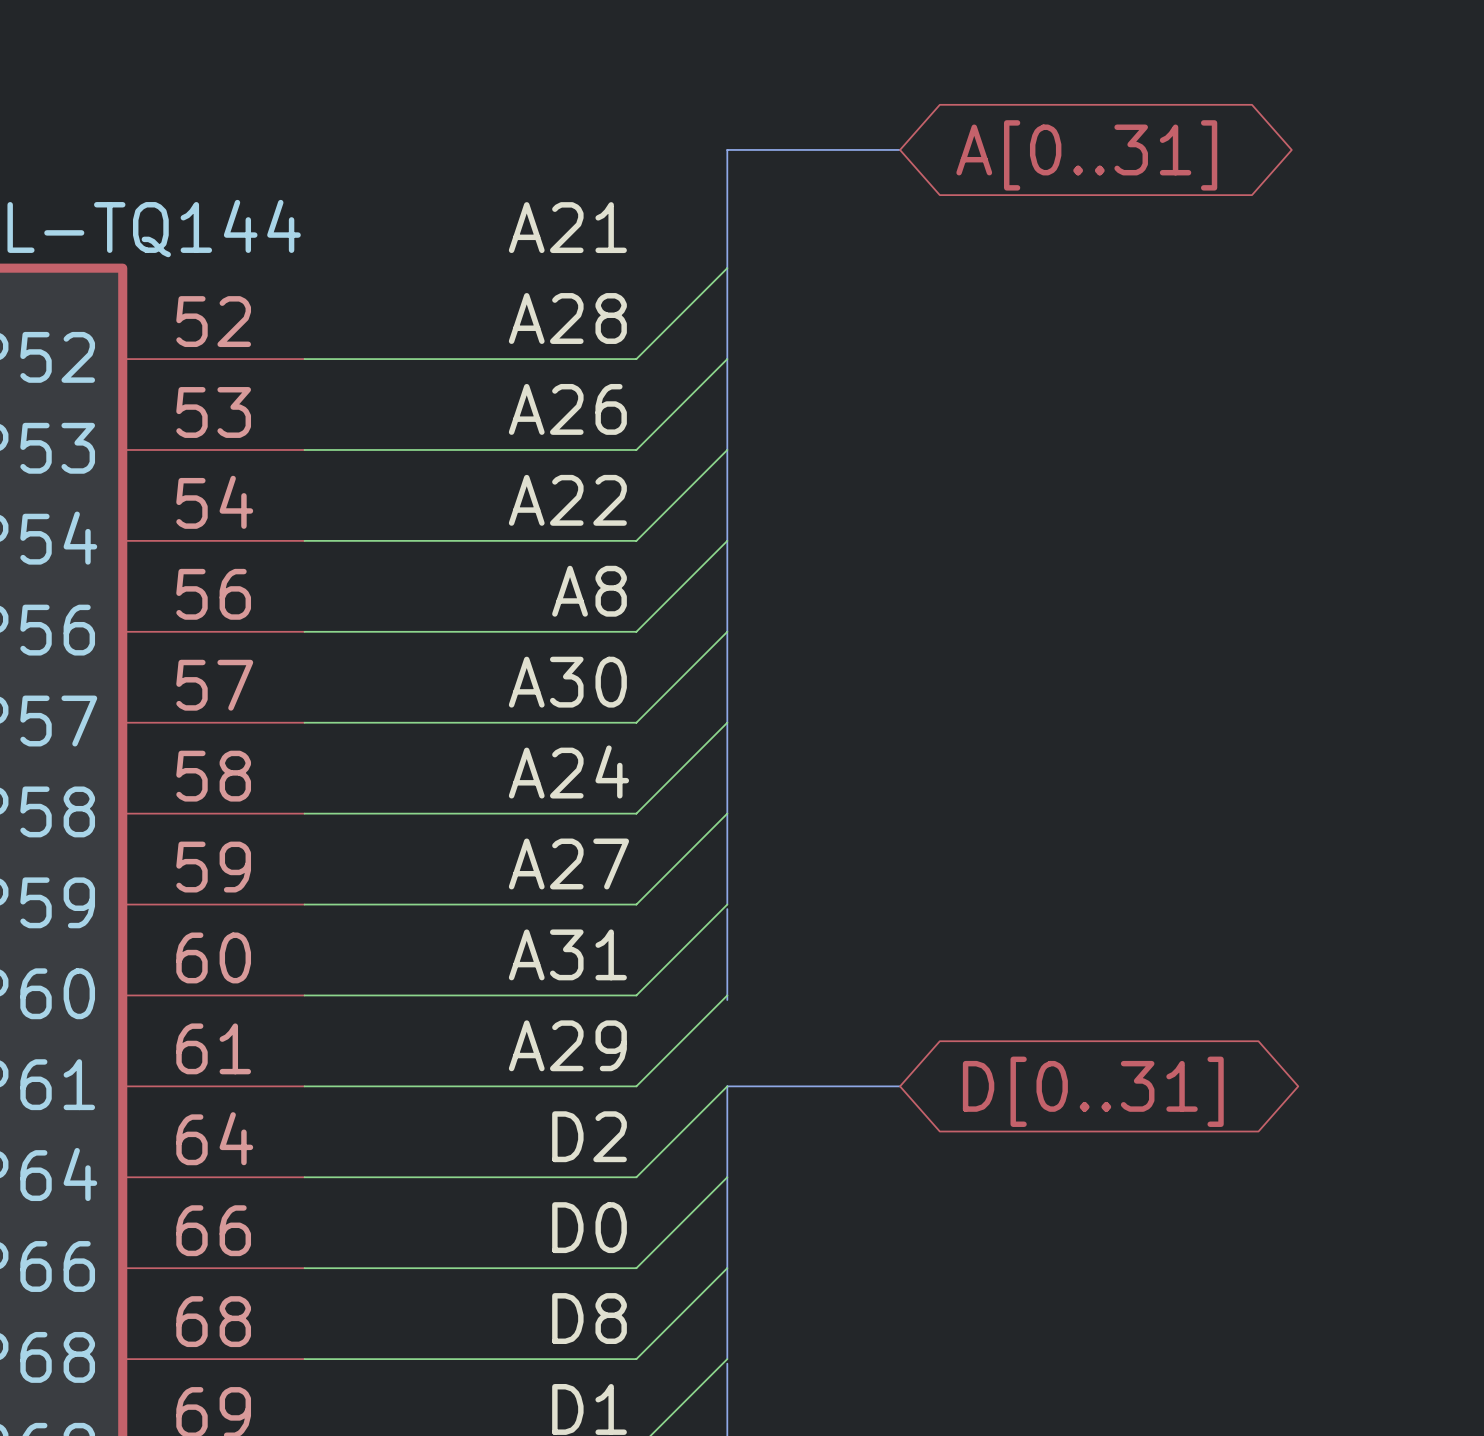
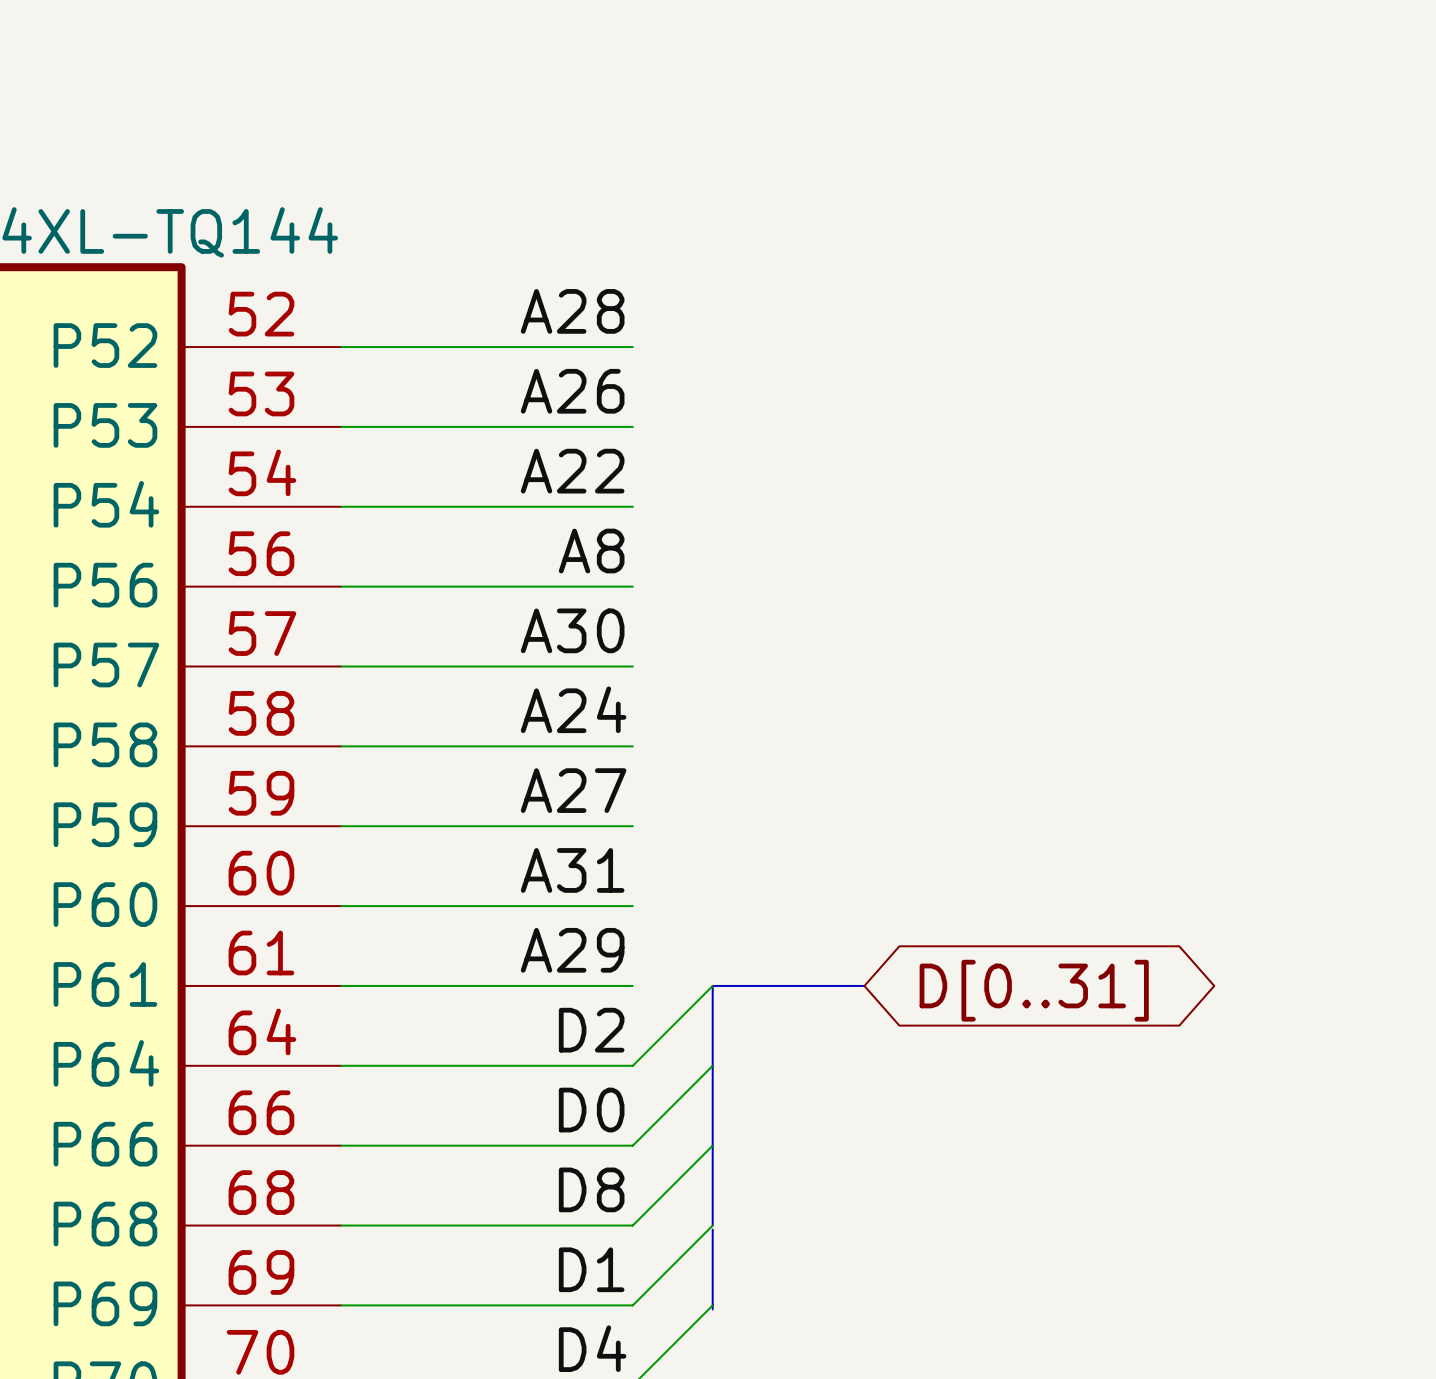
bus: (900, 149) (727, 149) (727, 904) -> none
global label: A[0..31] (1086, 155) -> none
label: A21 (567, 227) -> none
wire: (727, 268) (636, 359) -> none
wire: (727, 359) (636, 449) -> none
wire: (727, 449) (636, 540) -> none
wire: (727, 540) (636, 631) -> none
wire: (727, 631) (636, 722) -> none
wire: (727, 722) (636, 813) -> none
wire: (727, 813) (636, 904) -> none
wire: (727, 904) (636, 995) -> none
bus: (727, 909) (727, 1000) -> none
wire: (727, 995) (636, 1086) -> none

